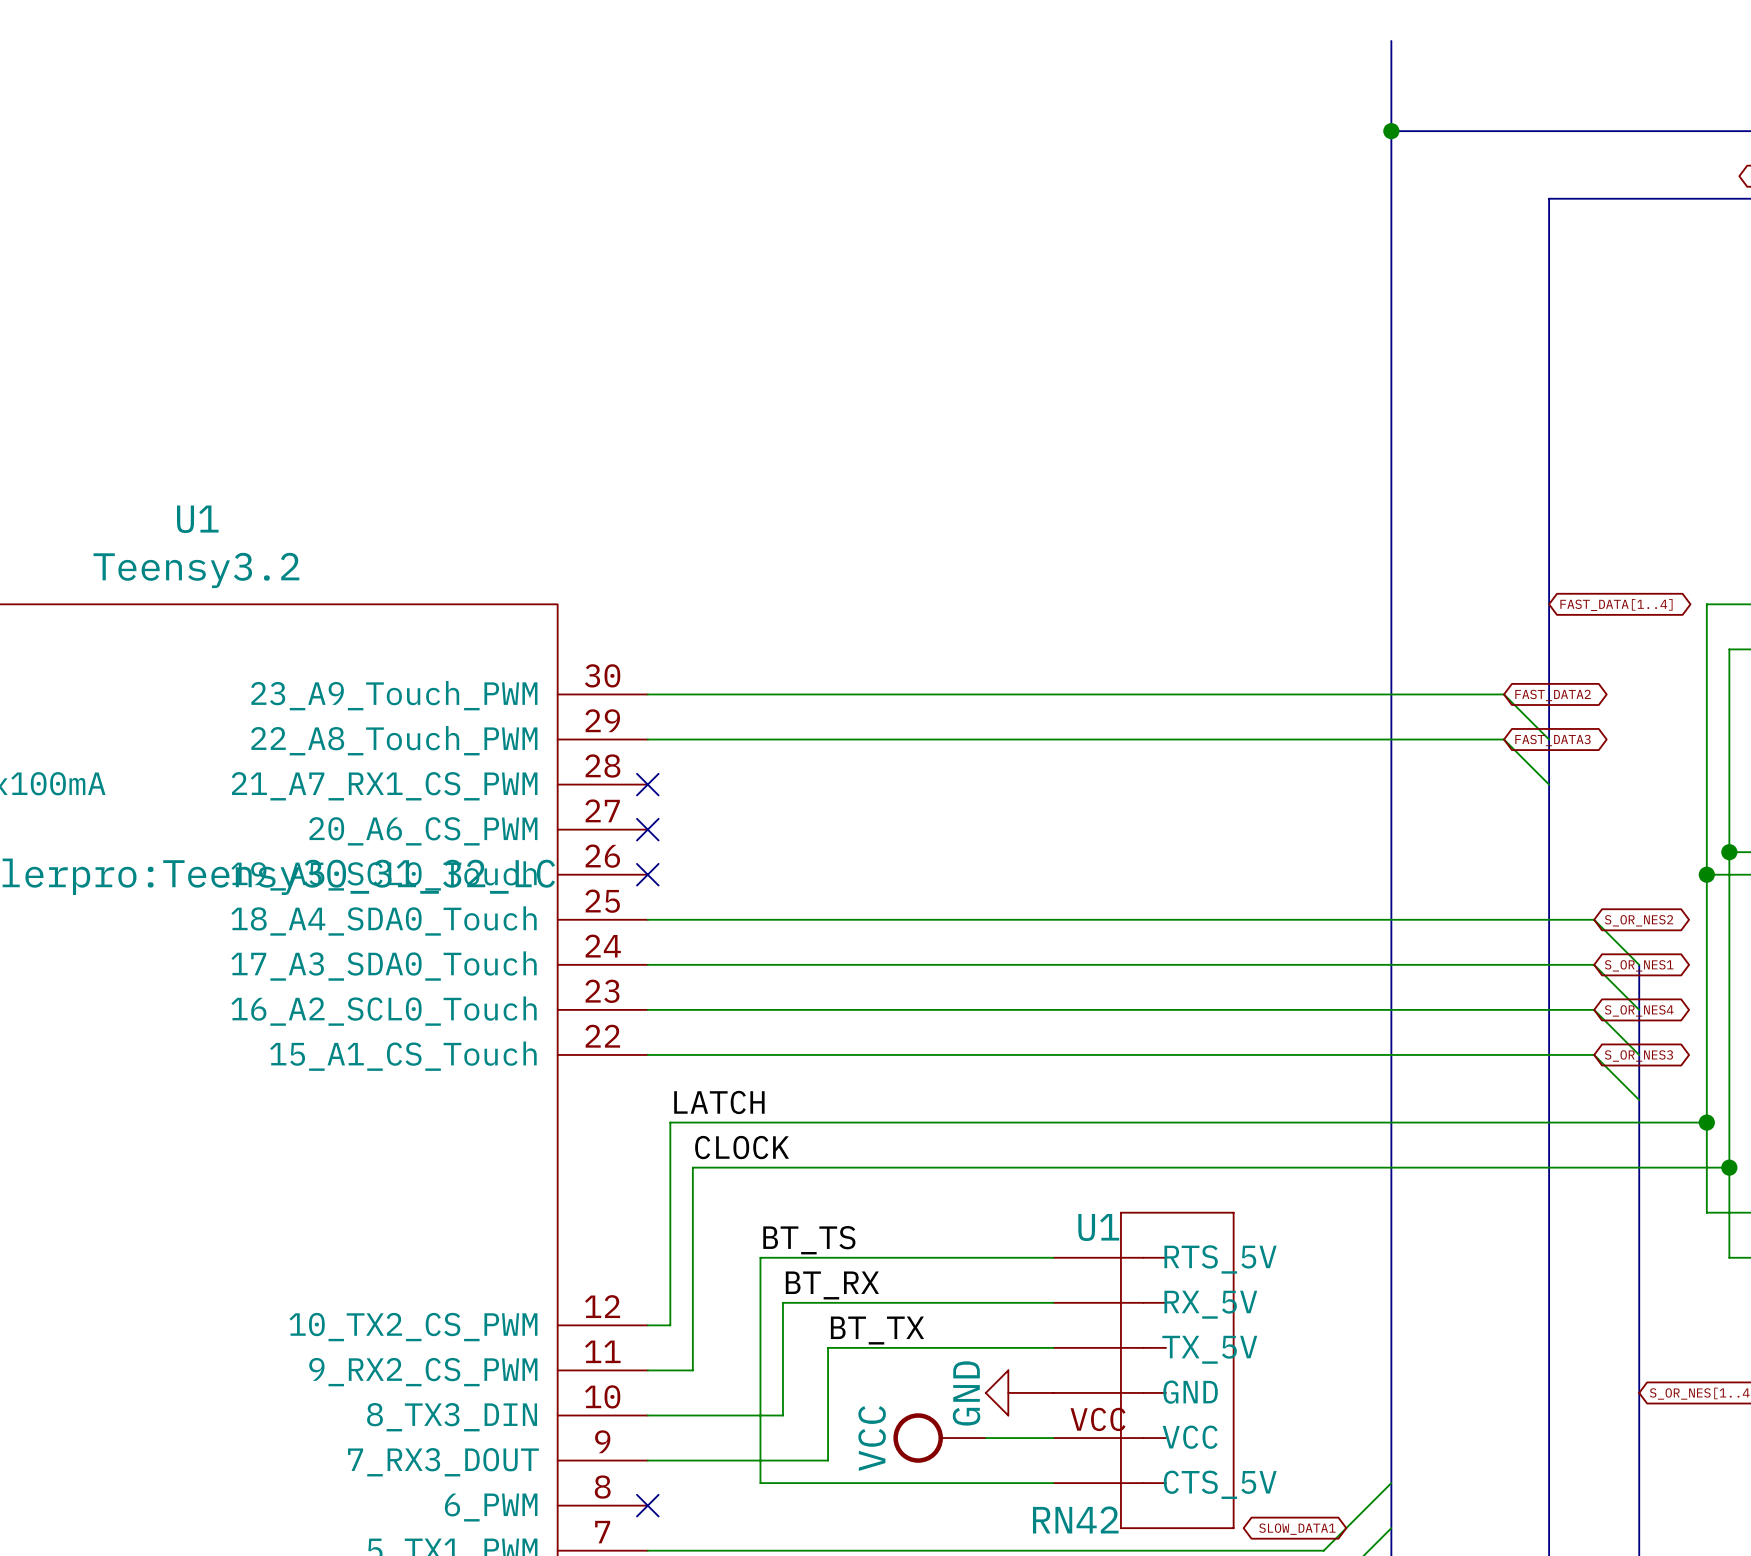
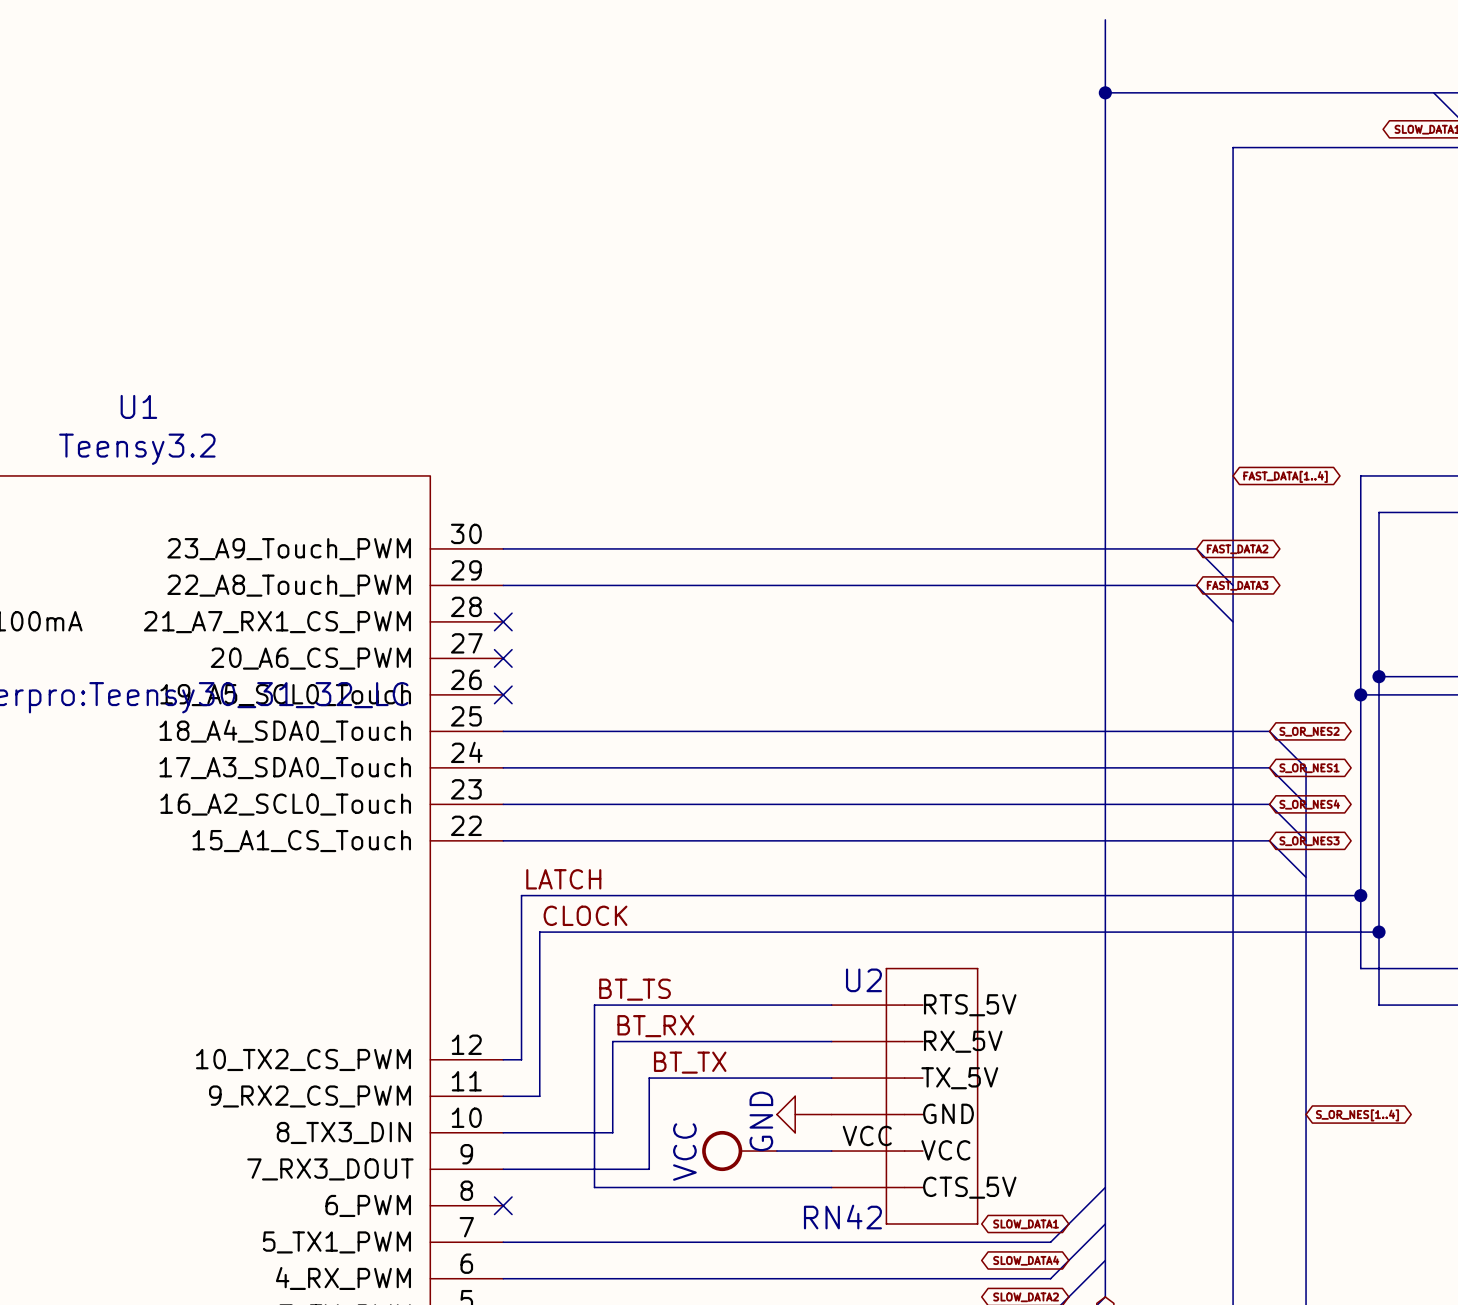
U1 name: U1 (1098, 1227) -> U2 (863, 980)

